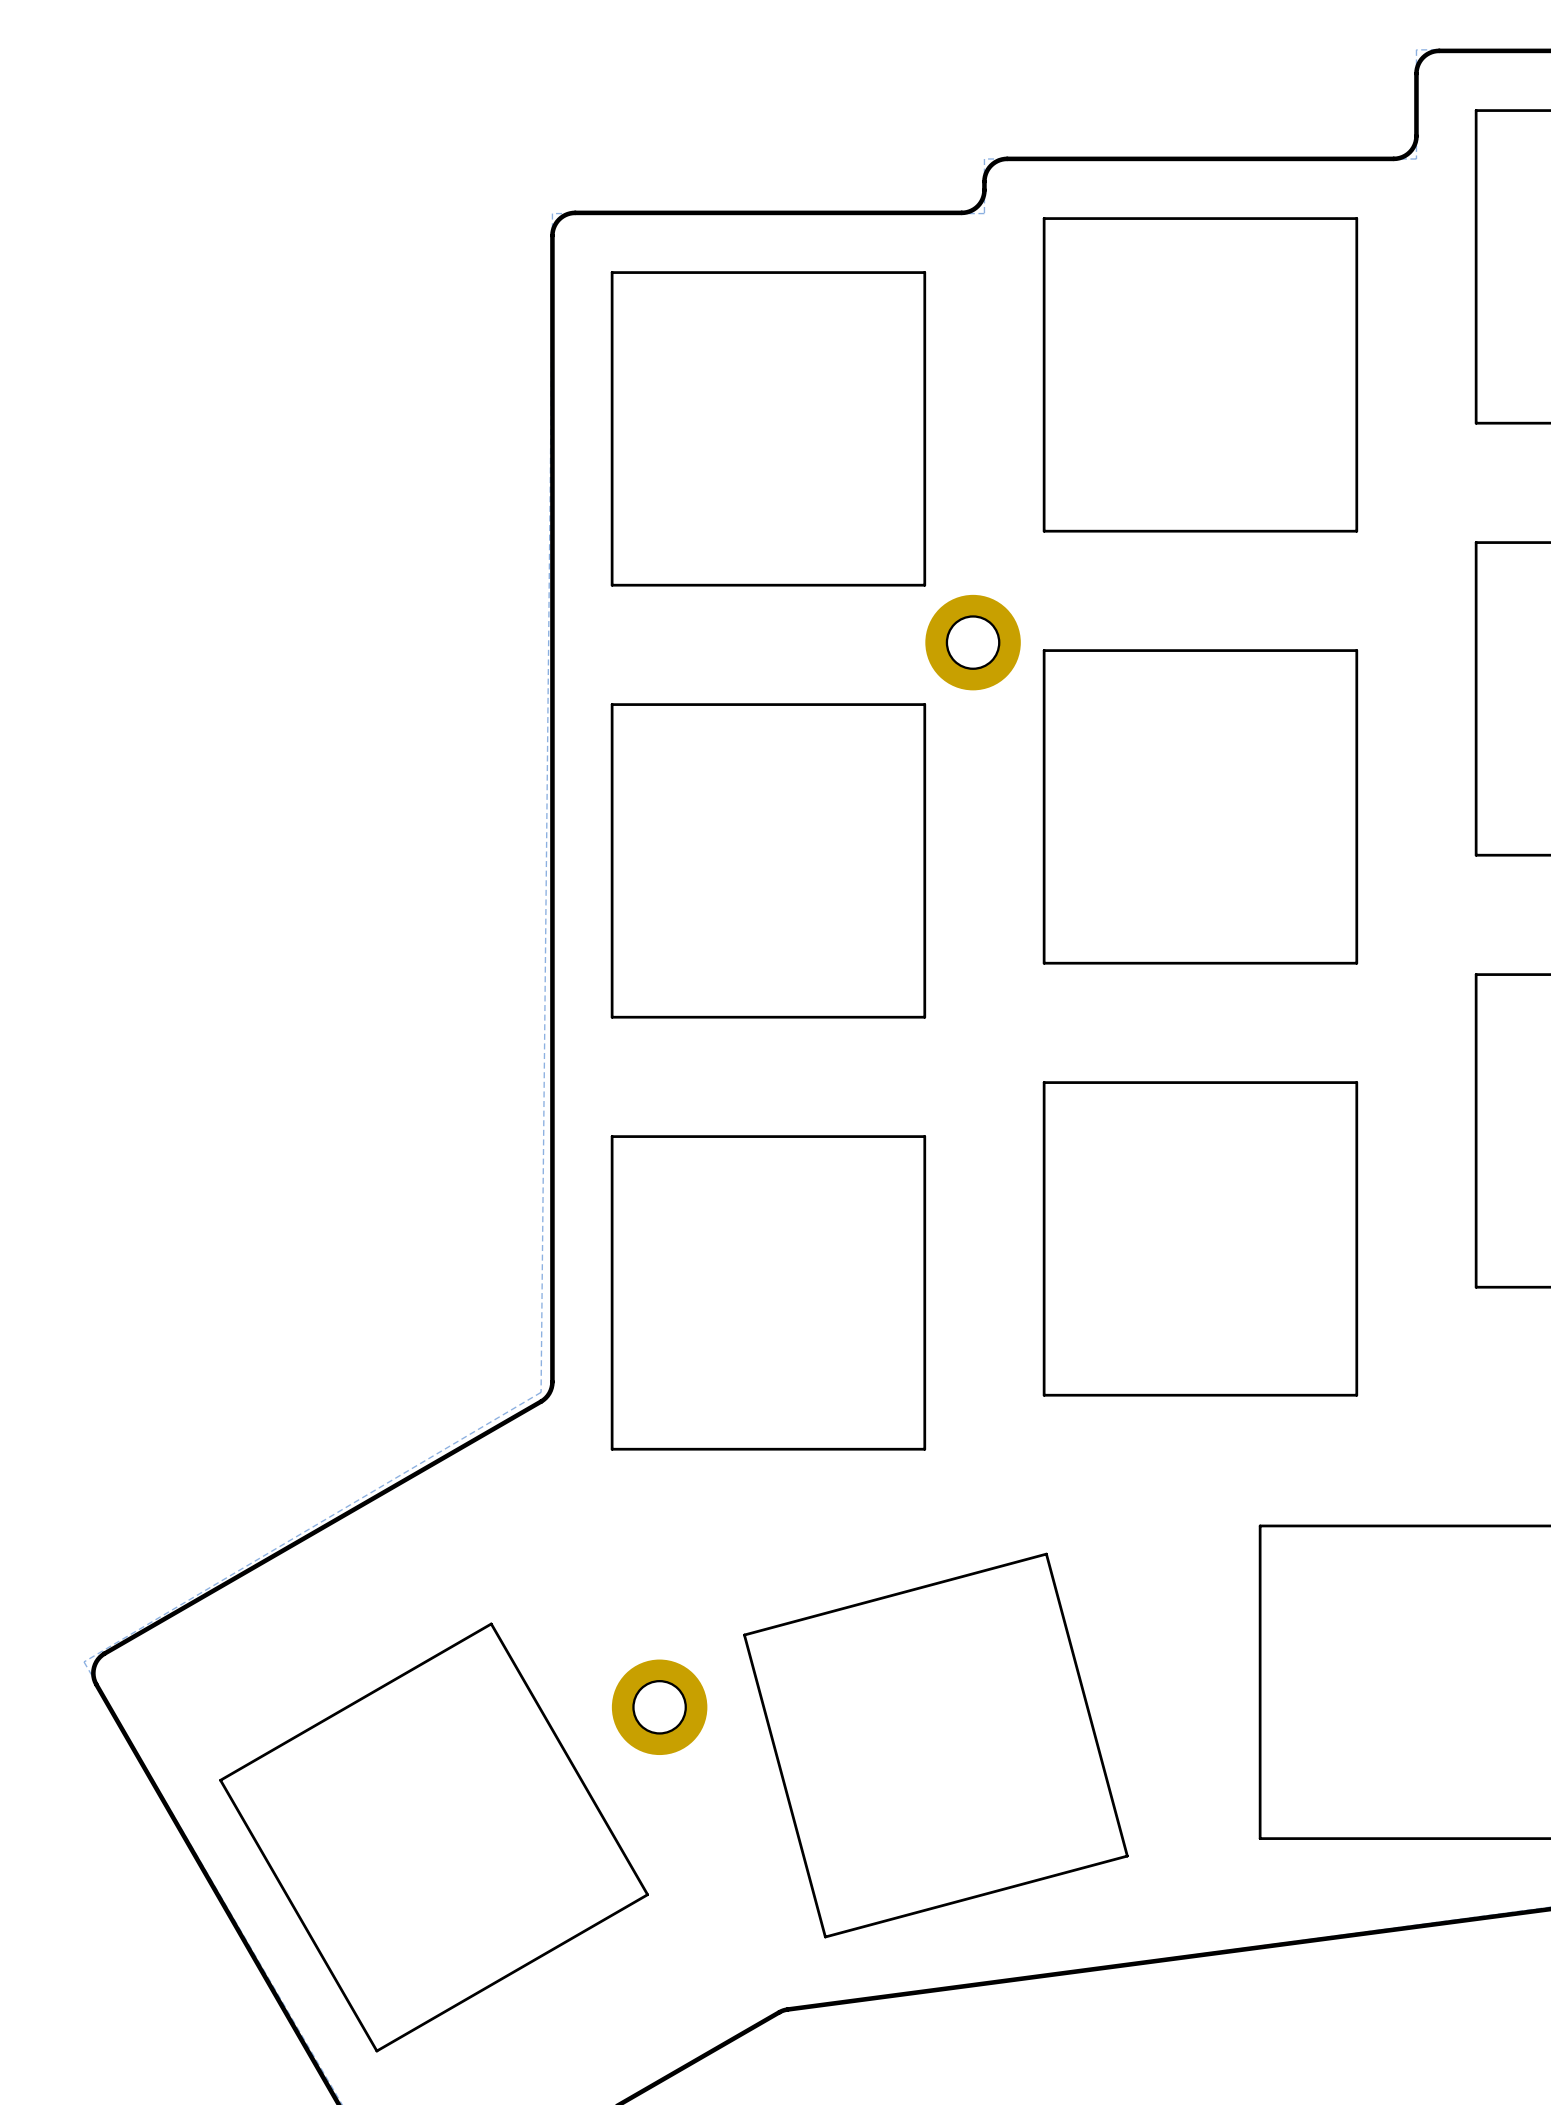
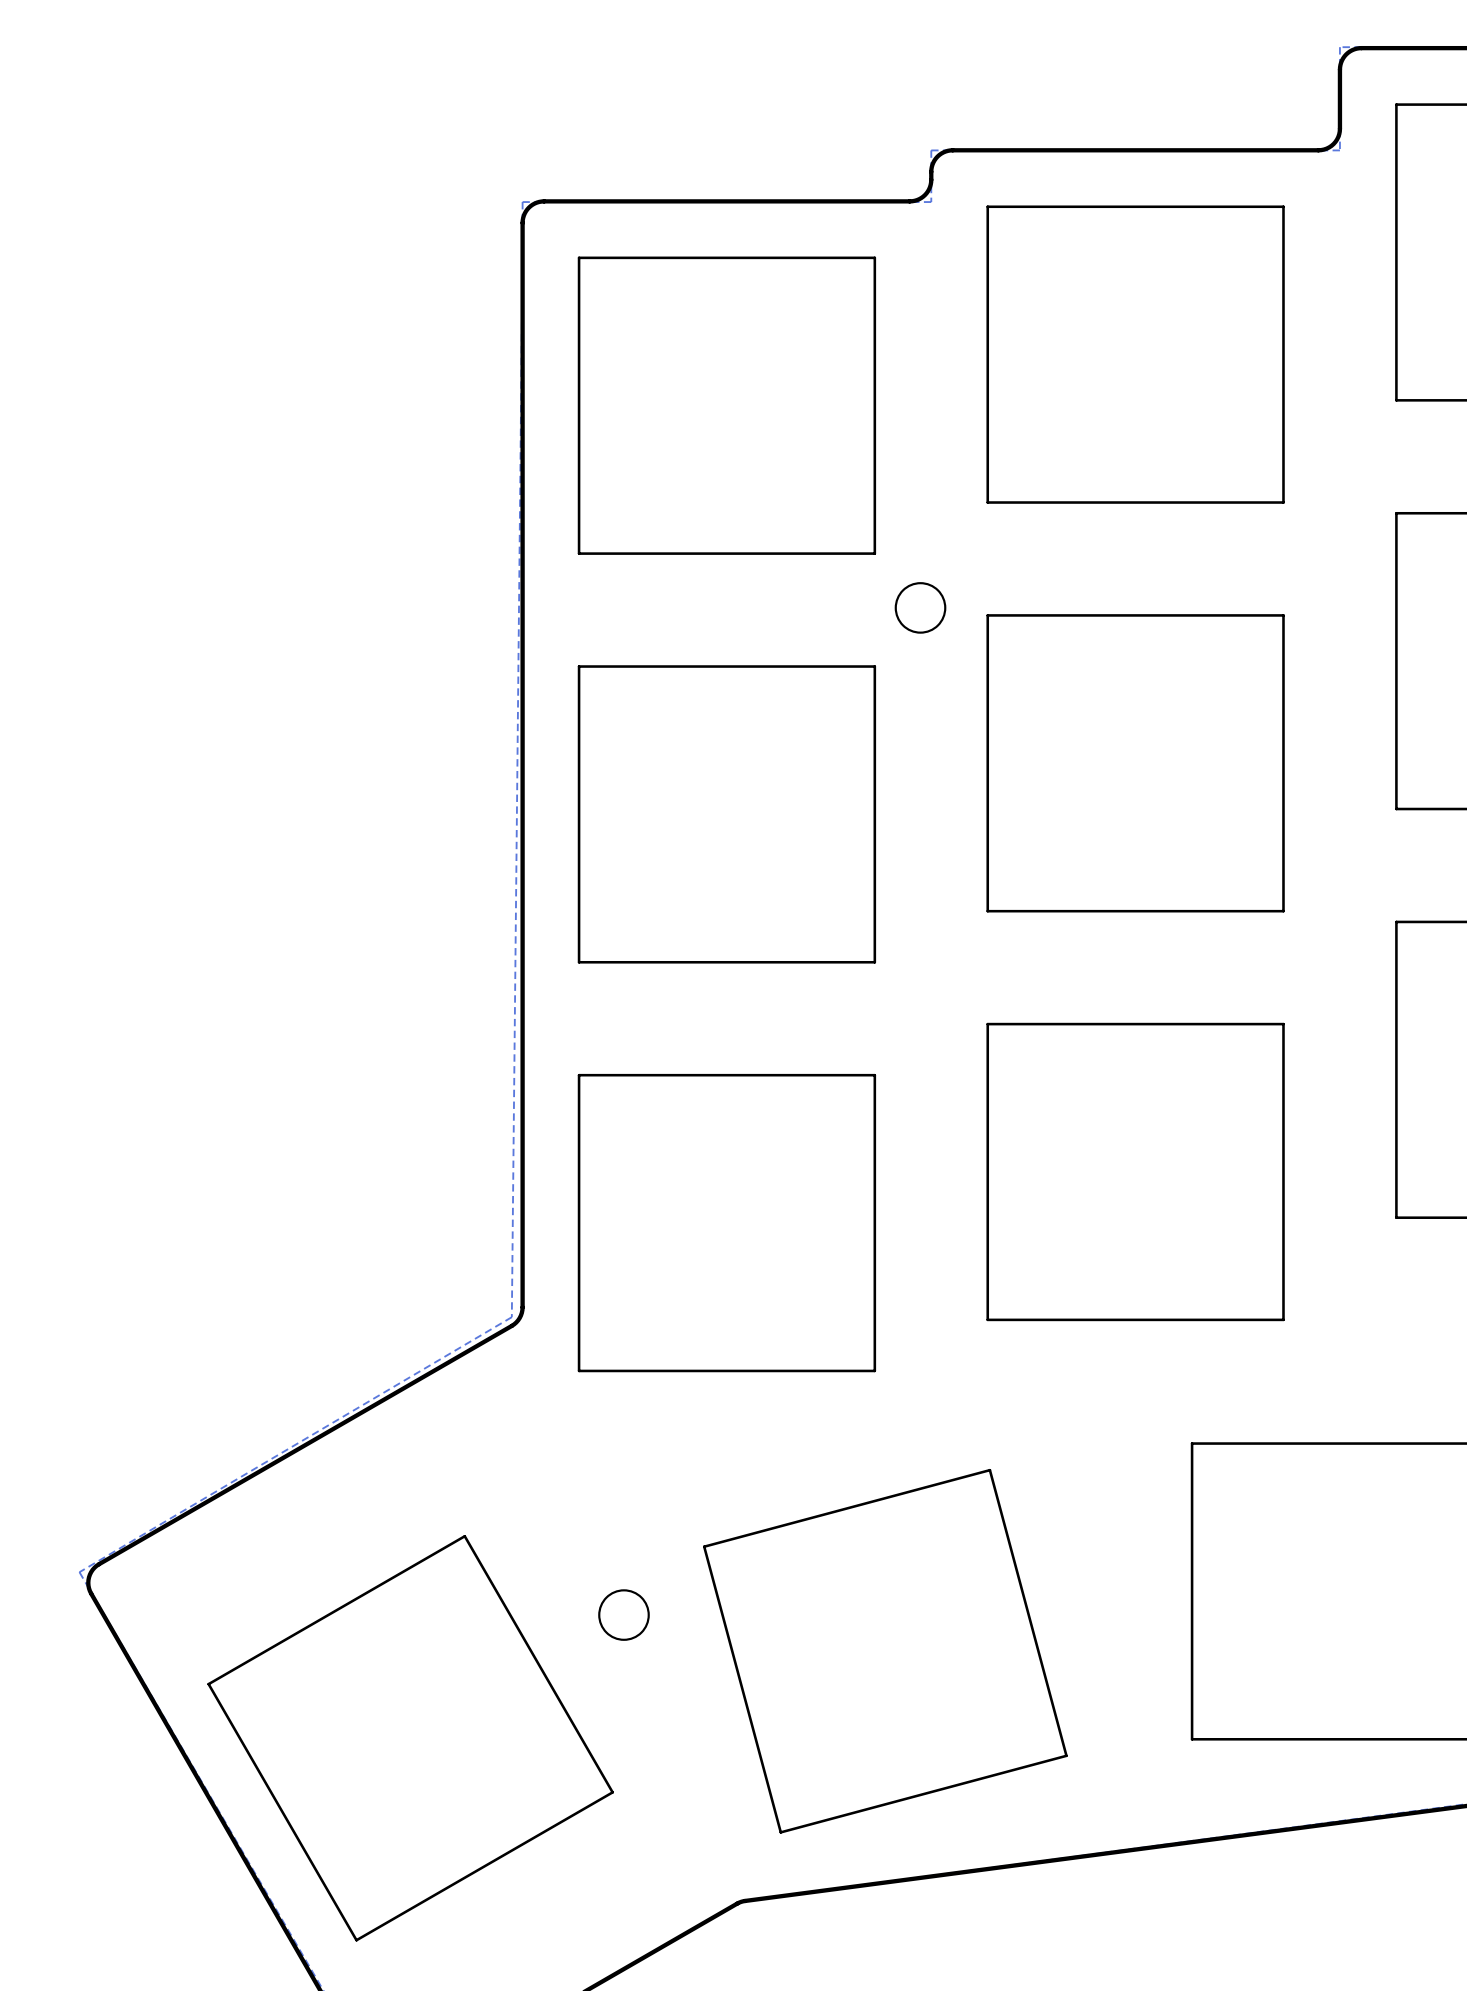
drawing: none -> [894, 582, 947, 634]
part: (973, 642) -> none
drawing: none -> [598, 1589, 650, 1641]
part: (659, 1707) -> none

